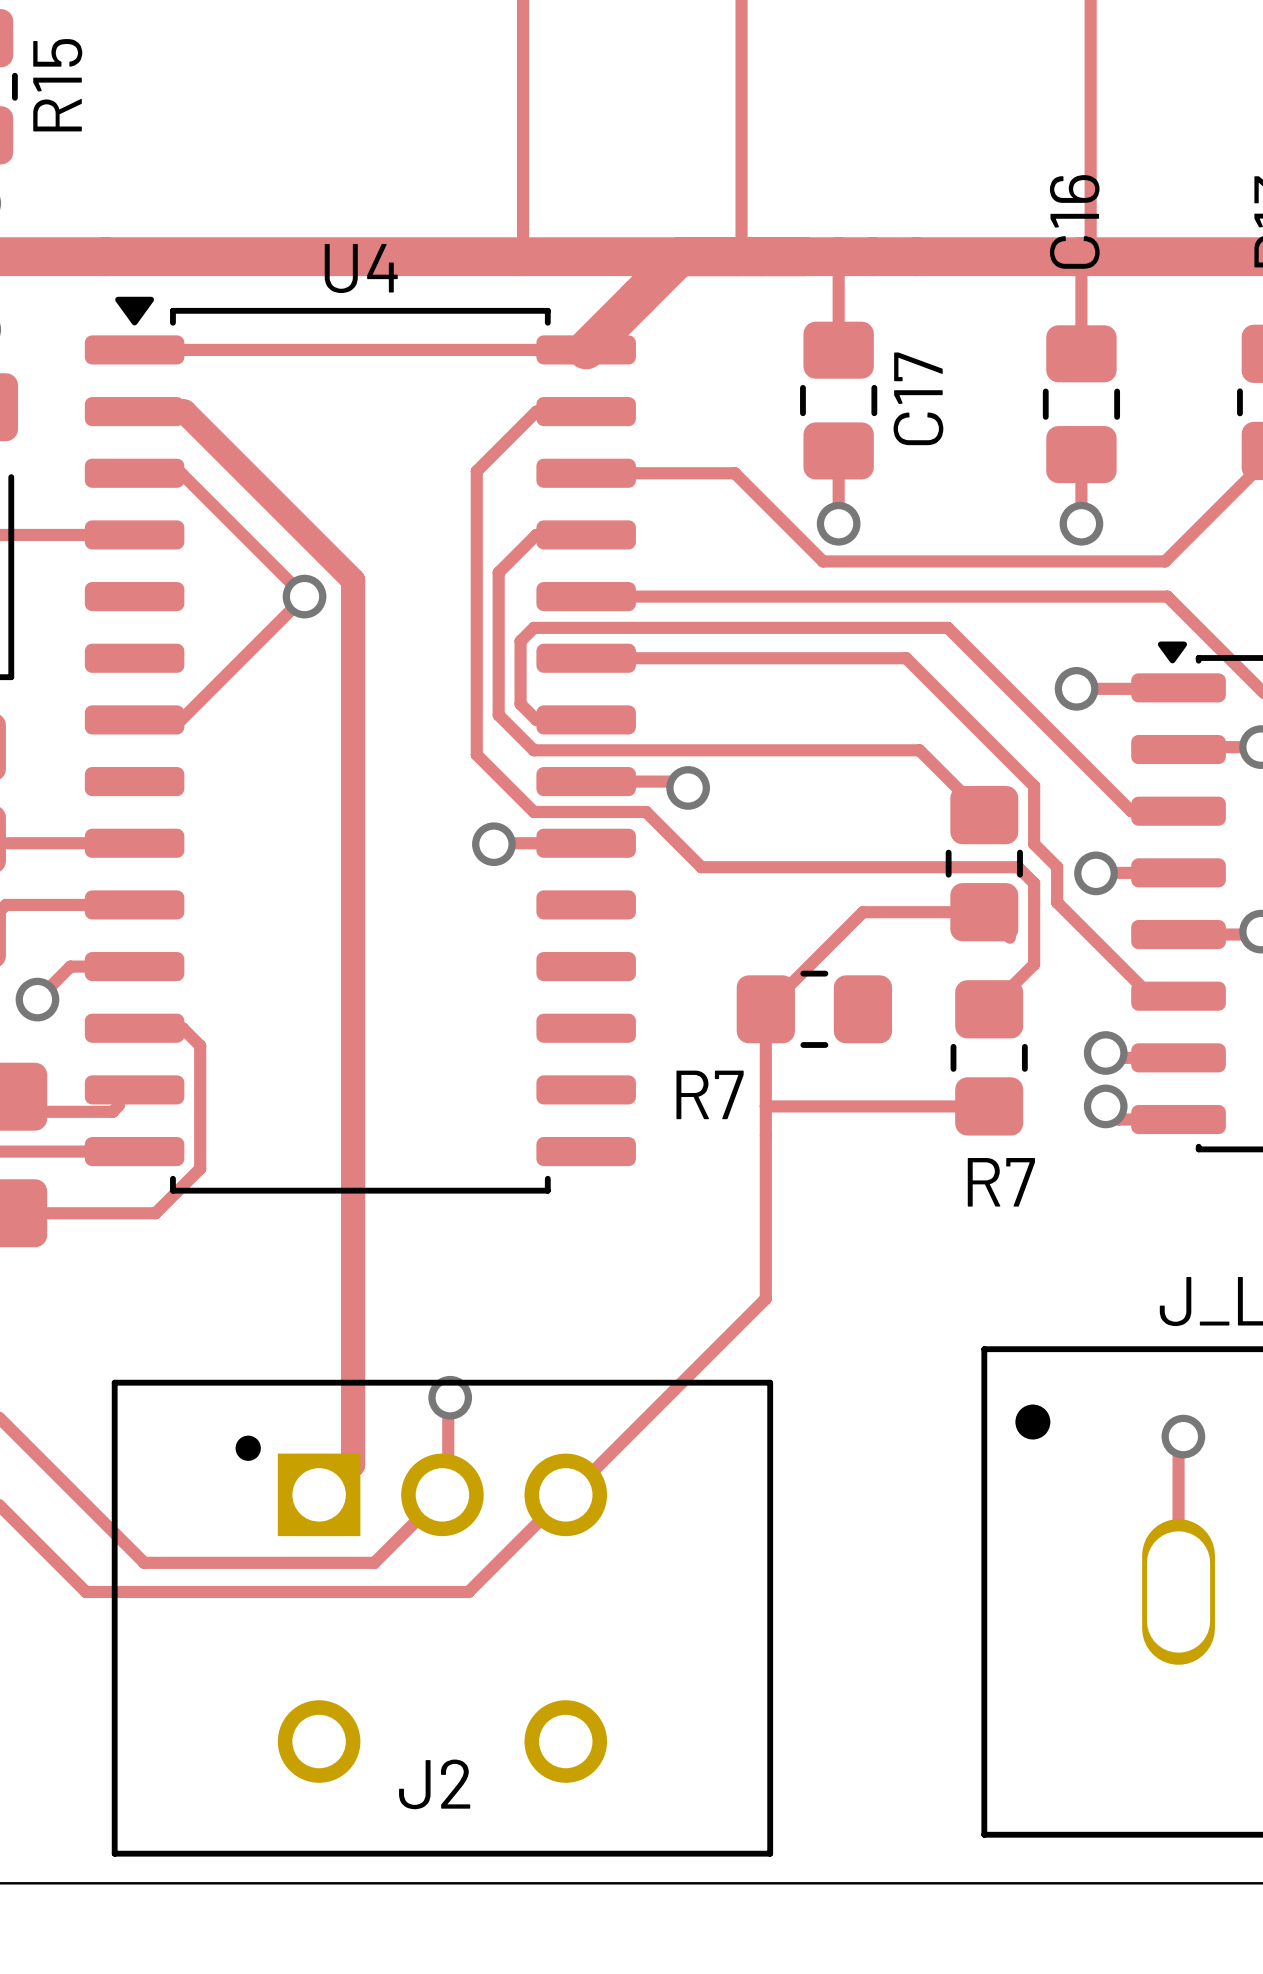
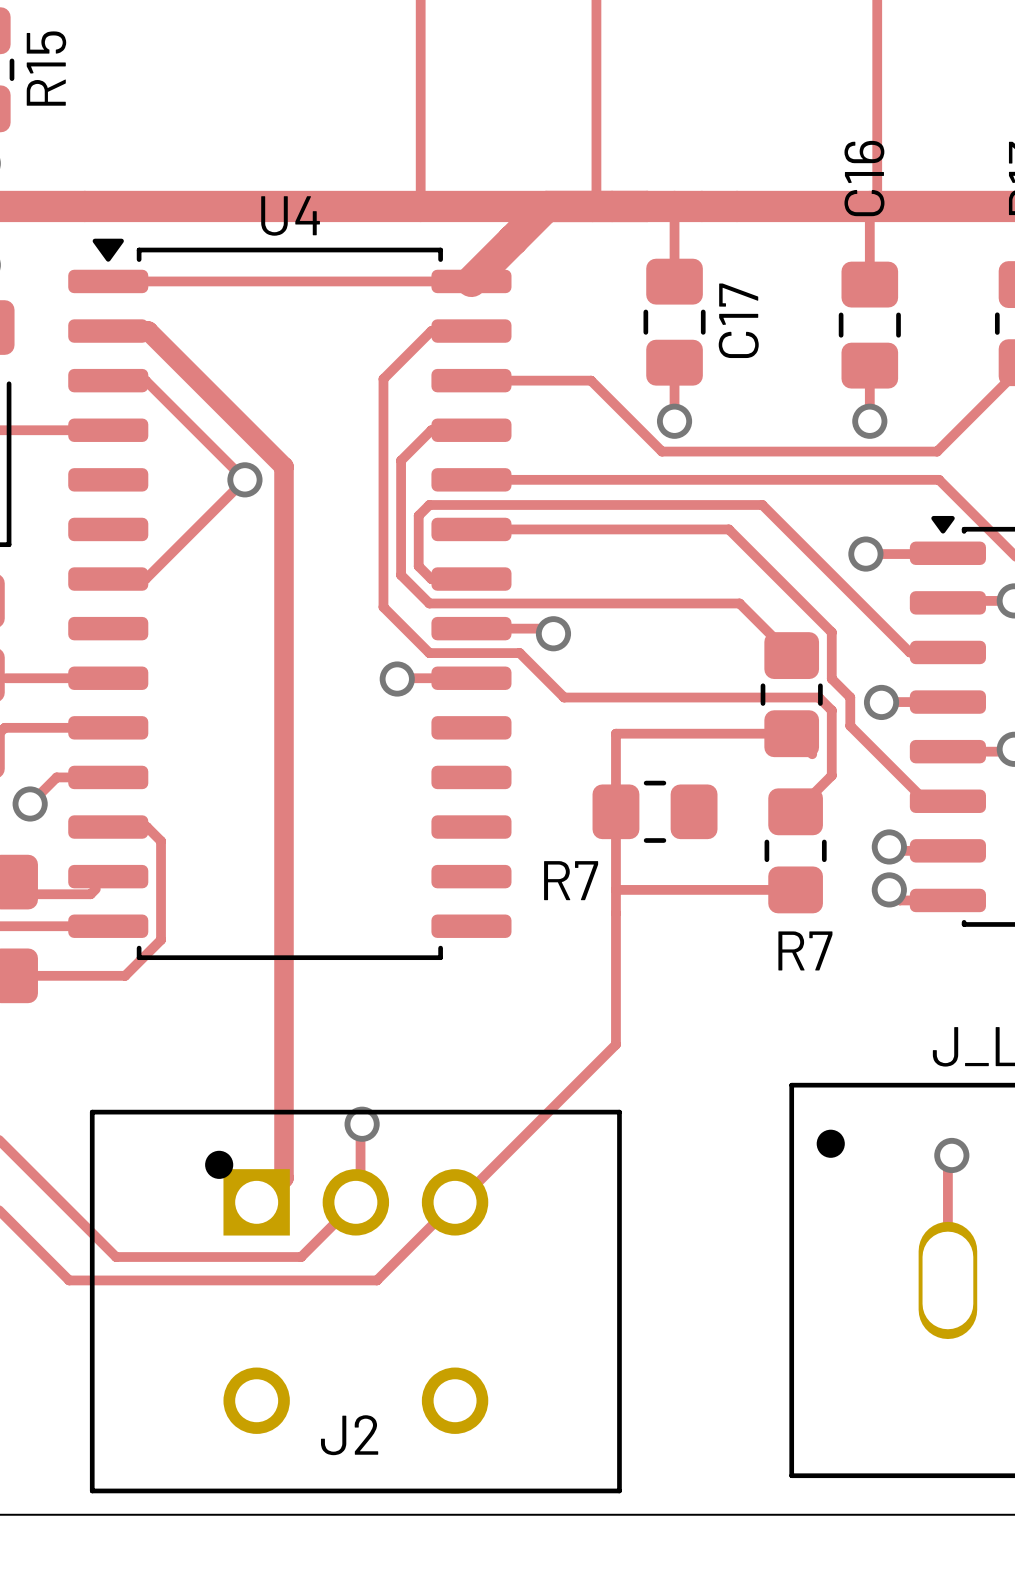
track: (862, 912) (765, 1009) -> (694, 733) (615, 733) (615, 811)
J2 footprint: [111, 1379, 774, 1857] -> [89, 1109, 622, 1494]

